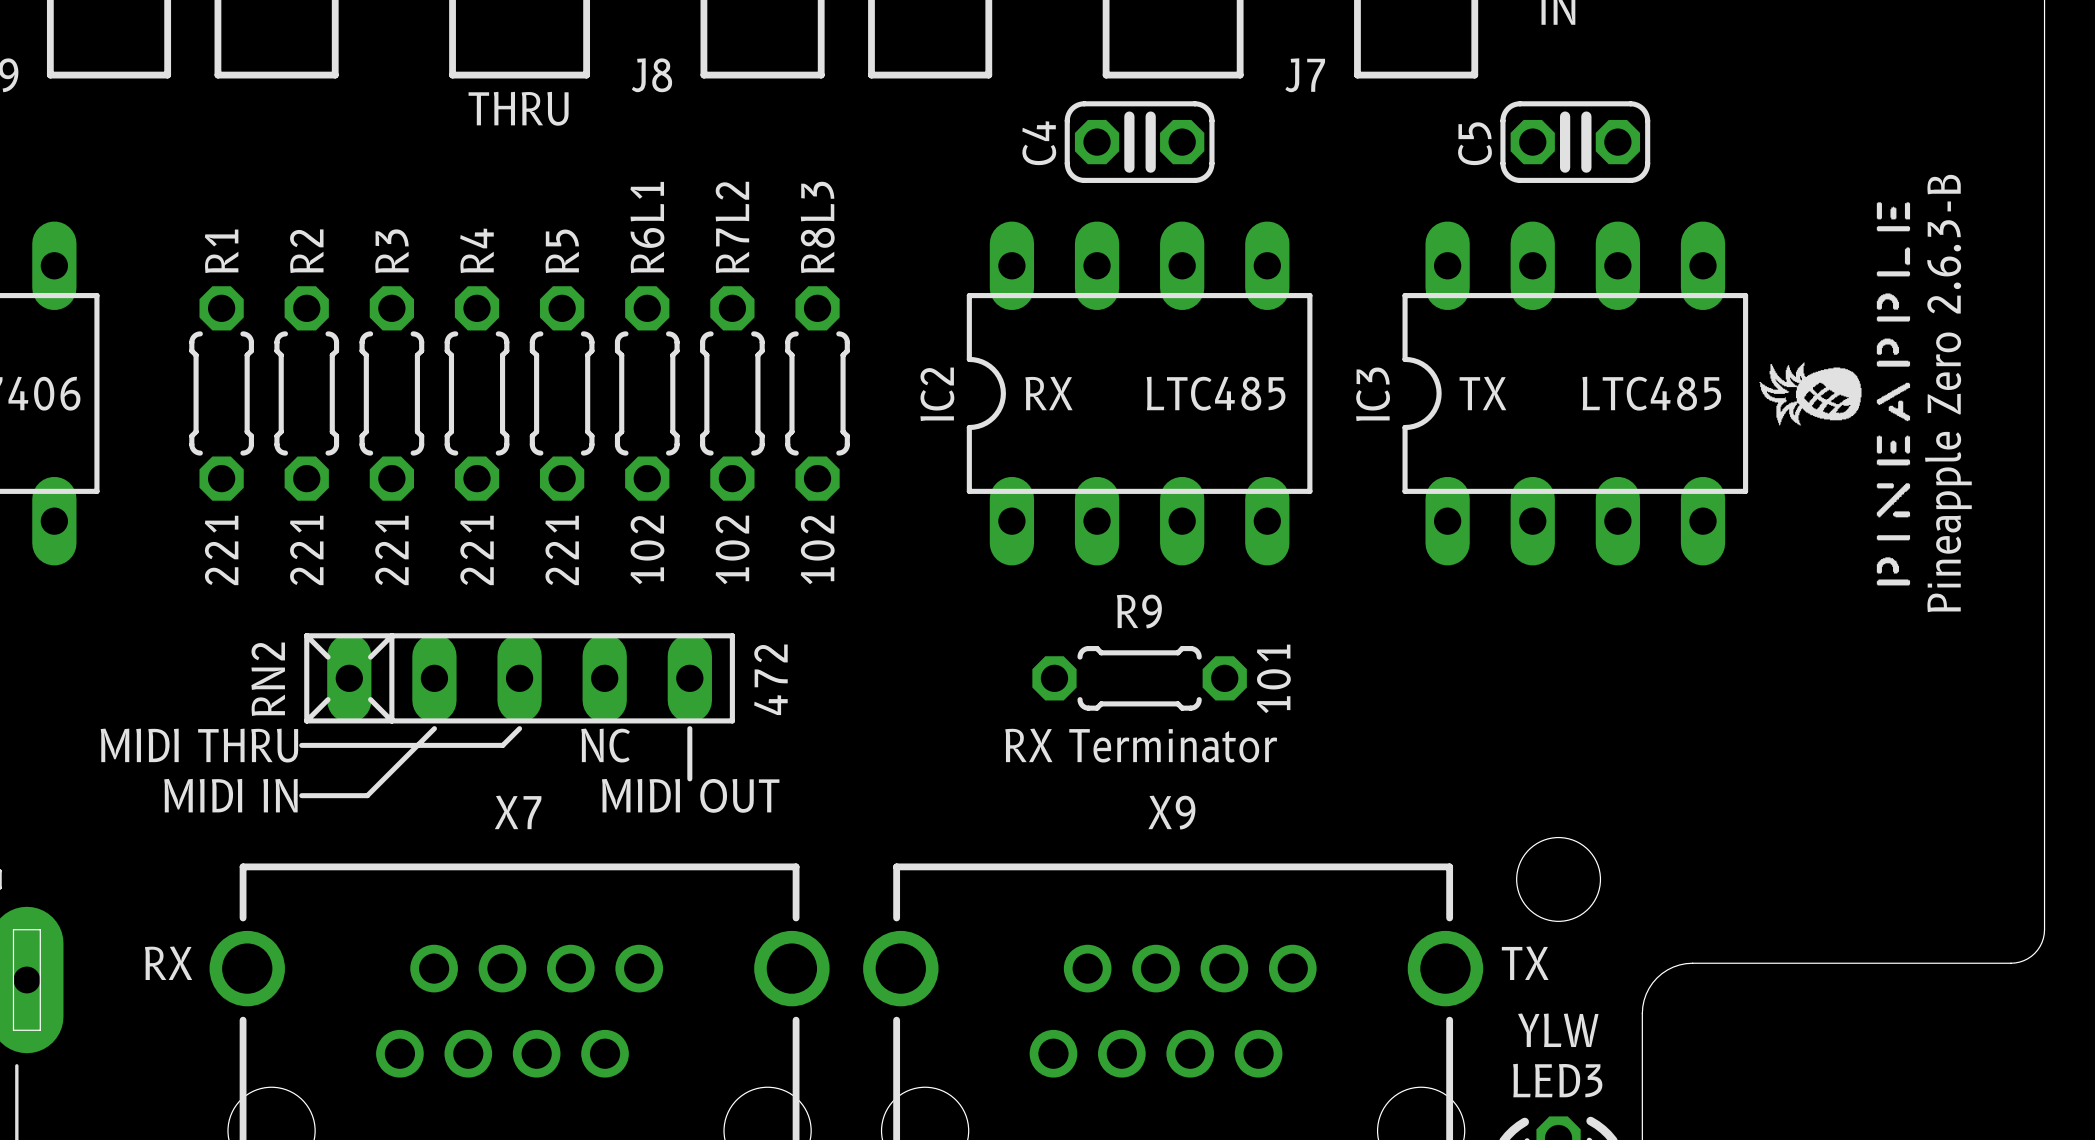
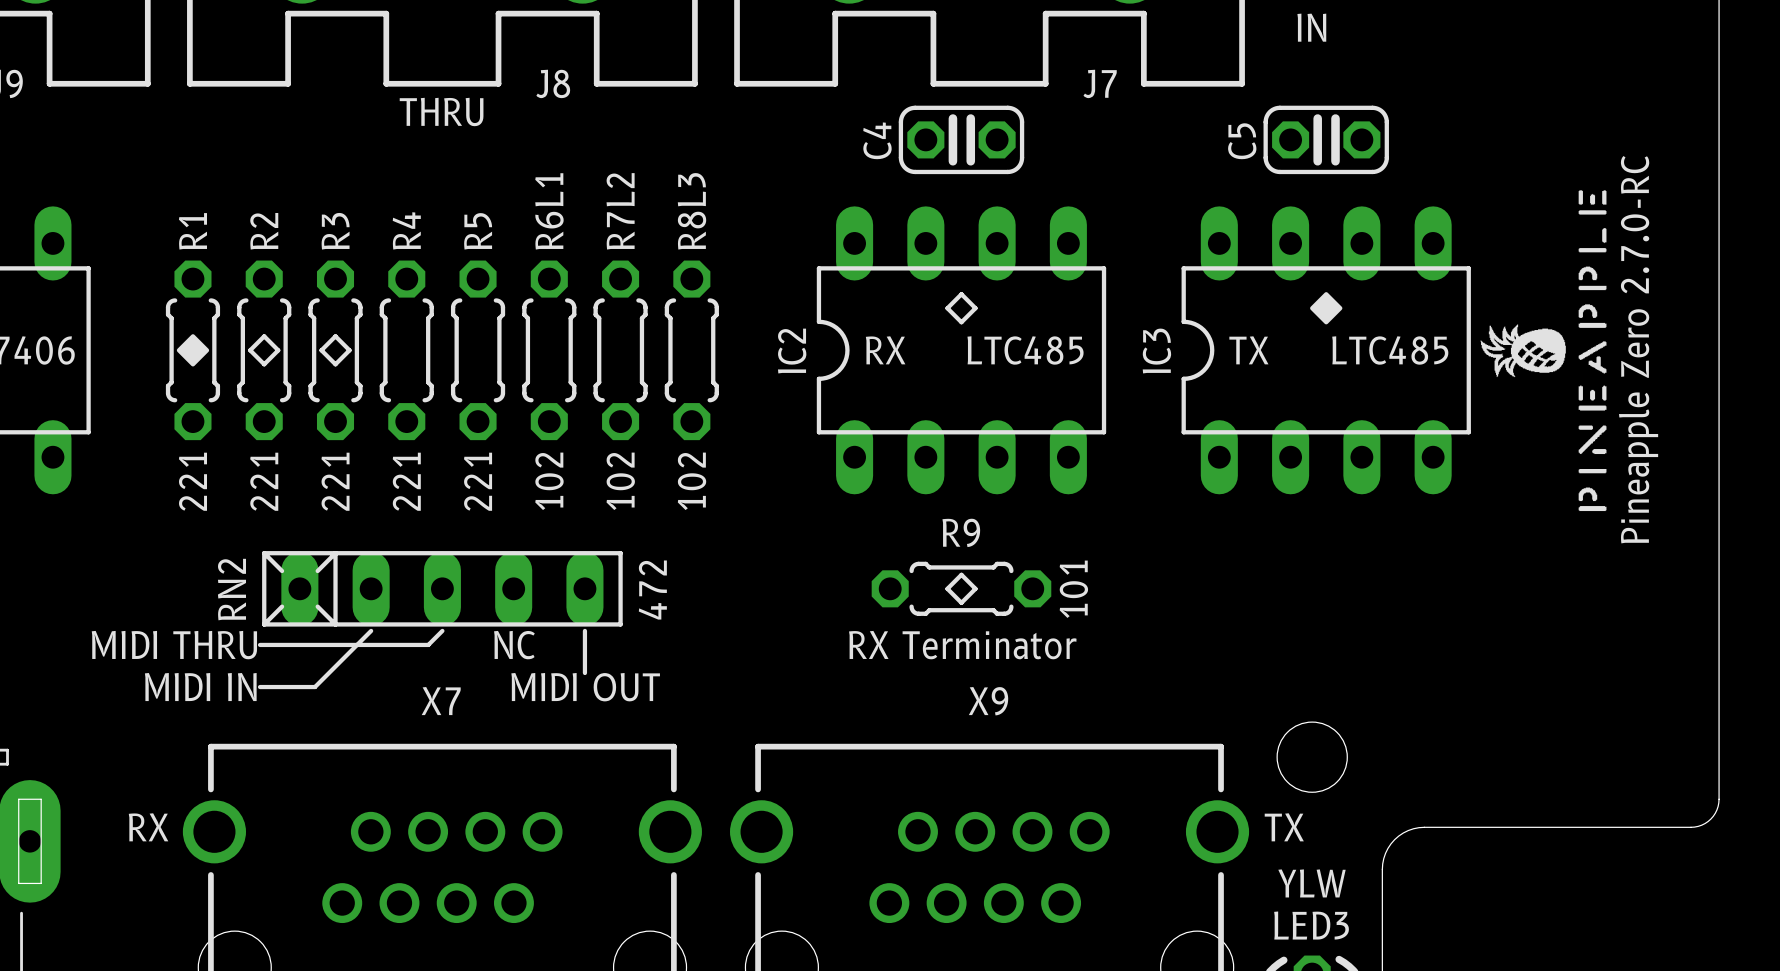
drawing: none -> [1310, 292, 1343, 325]
line: none -> (961, 294) (947, 308) (961, 322) (975, 308) (961, 294)
drawing: none -> [176, 334, 210, 367]
line: none -> (264, 336) (250, 350) (264, 364) (278, 350) (264, 336)
line: none -> (335, 336) (321, 350) (335, 364) (349, 350) (335, 336)
text: Pineapple Zero 2.6.3-B (1948, 393) -> Pineapple Zero 2.7.0-RC (1638, 349)
line: none -> (961, 574) (947, 588) (961, 602) (975, 588) (961, 574)

